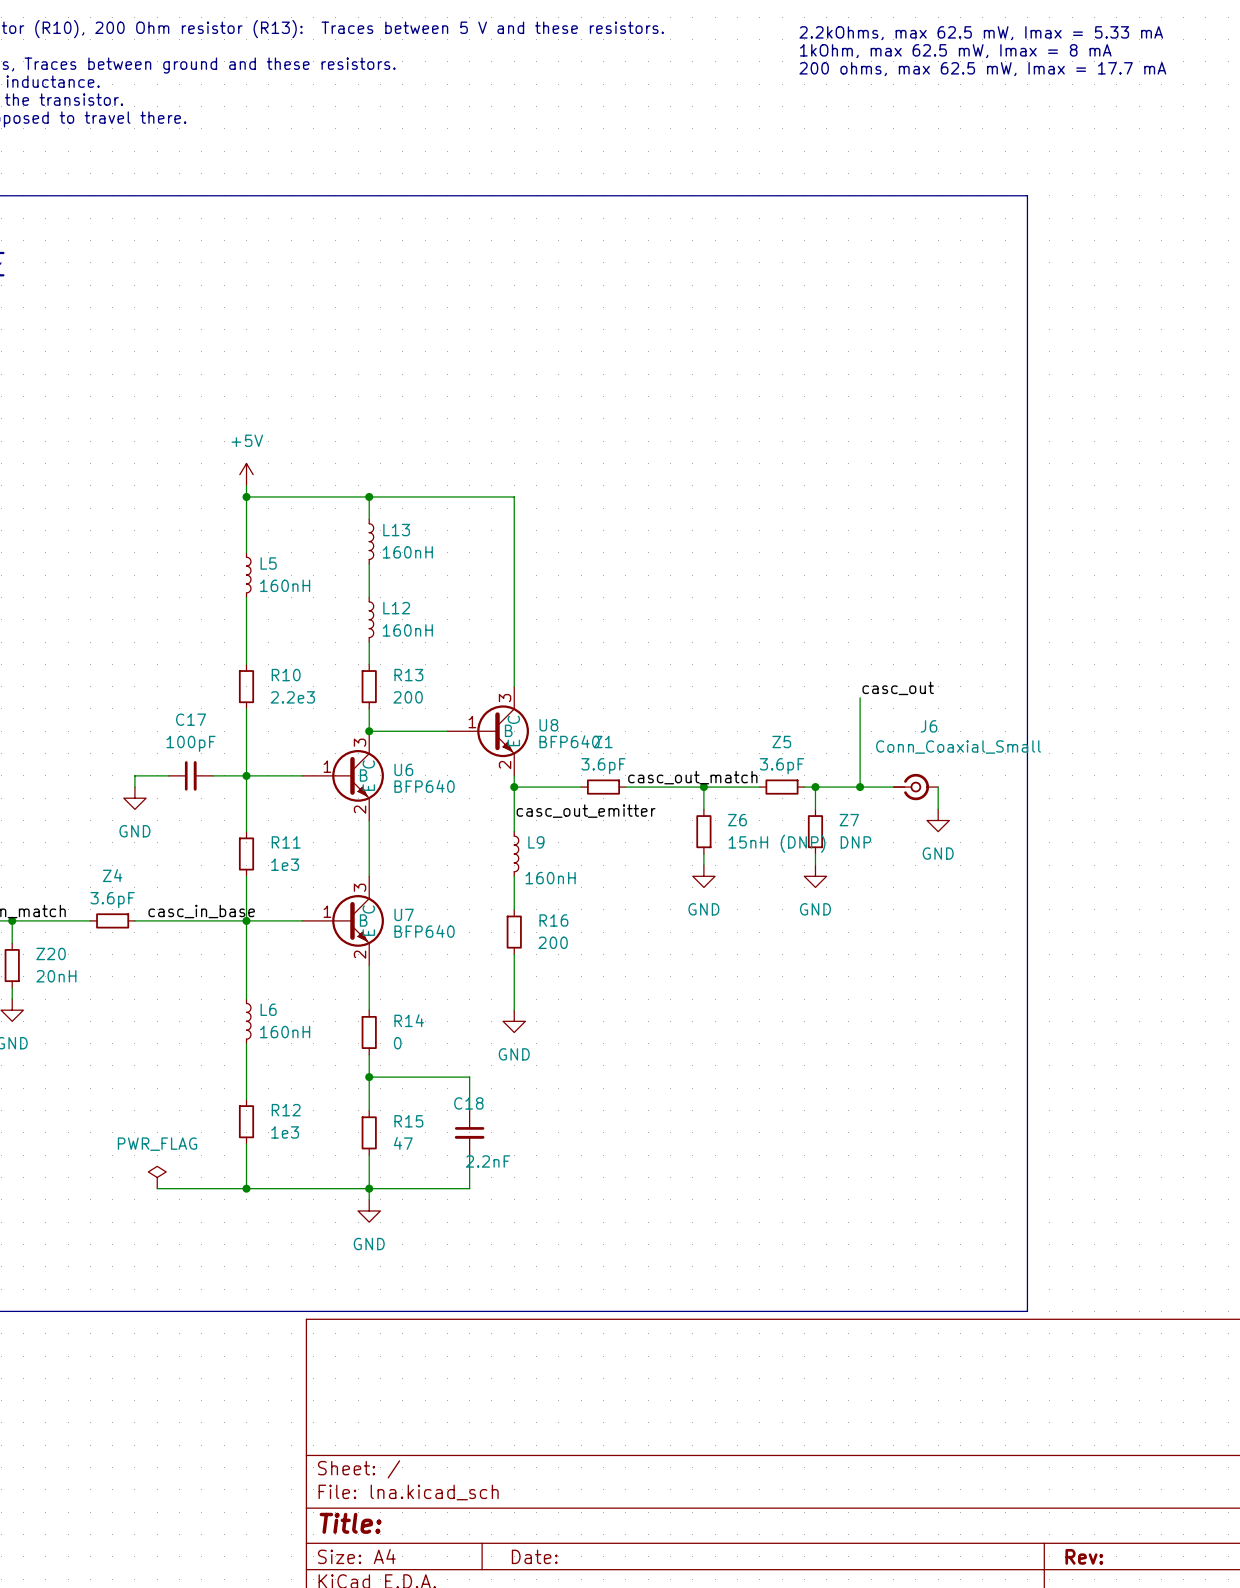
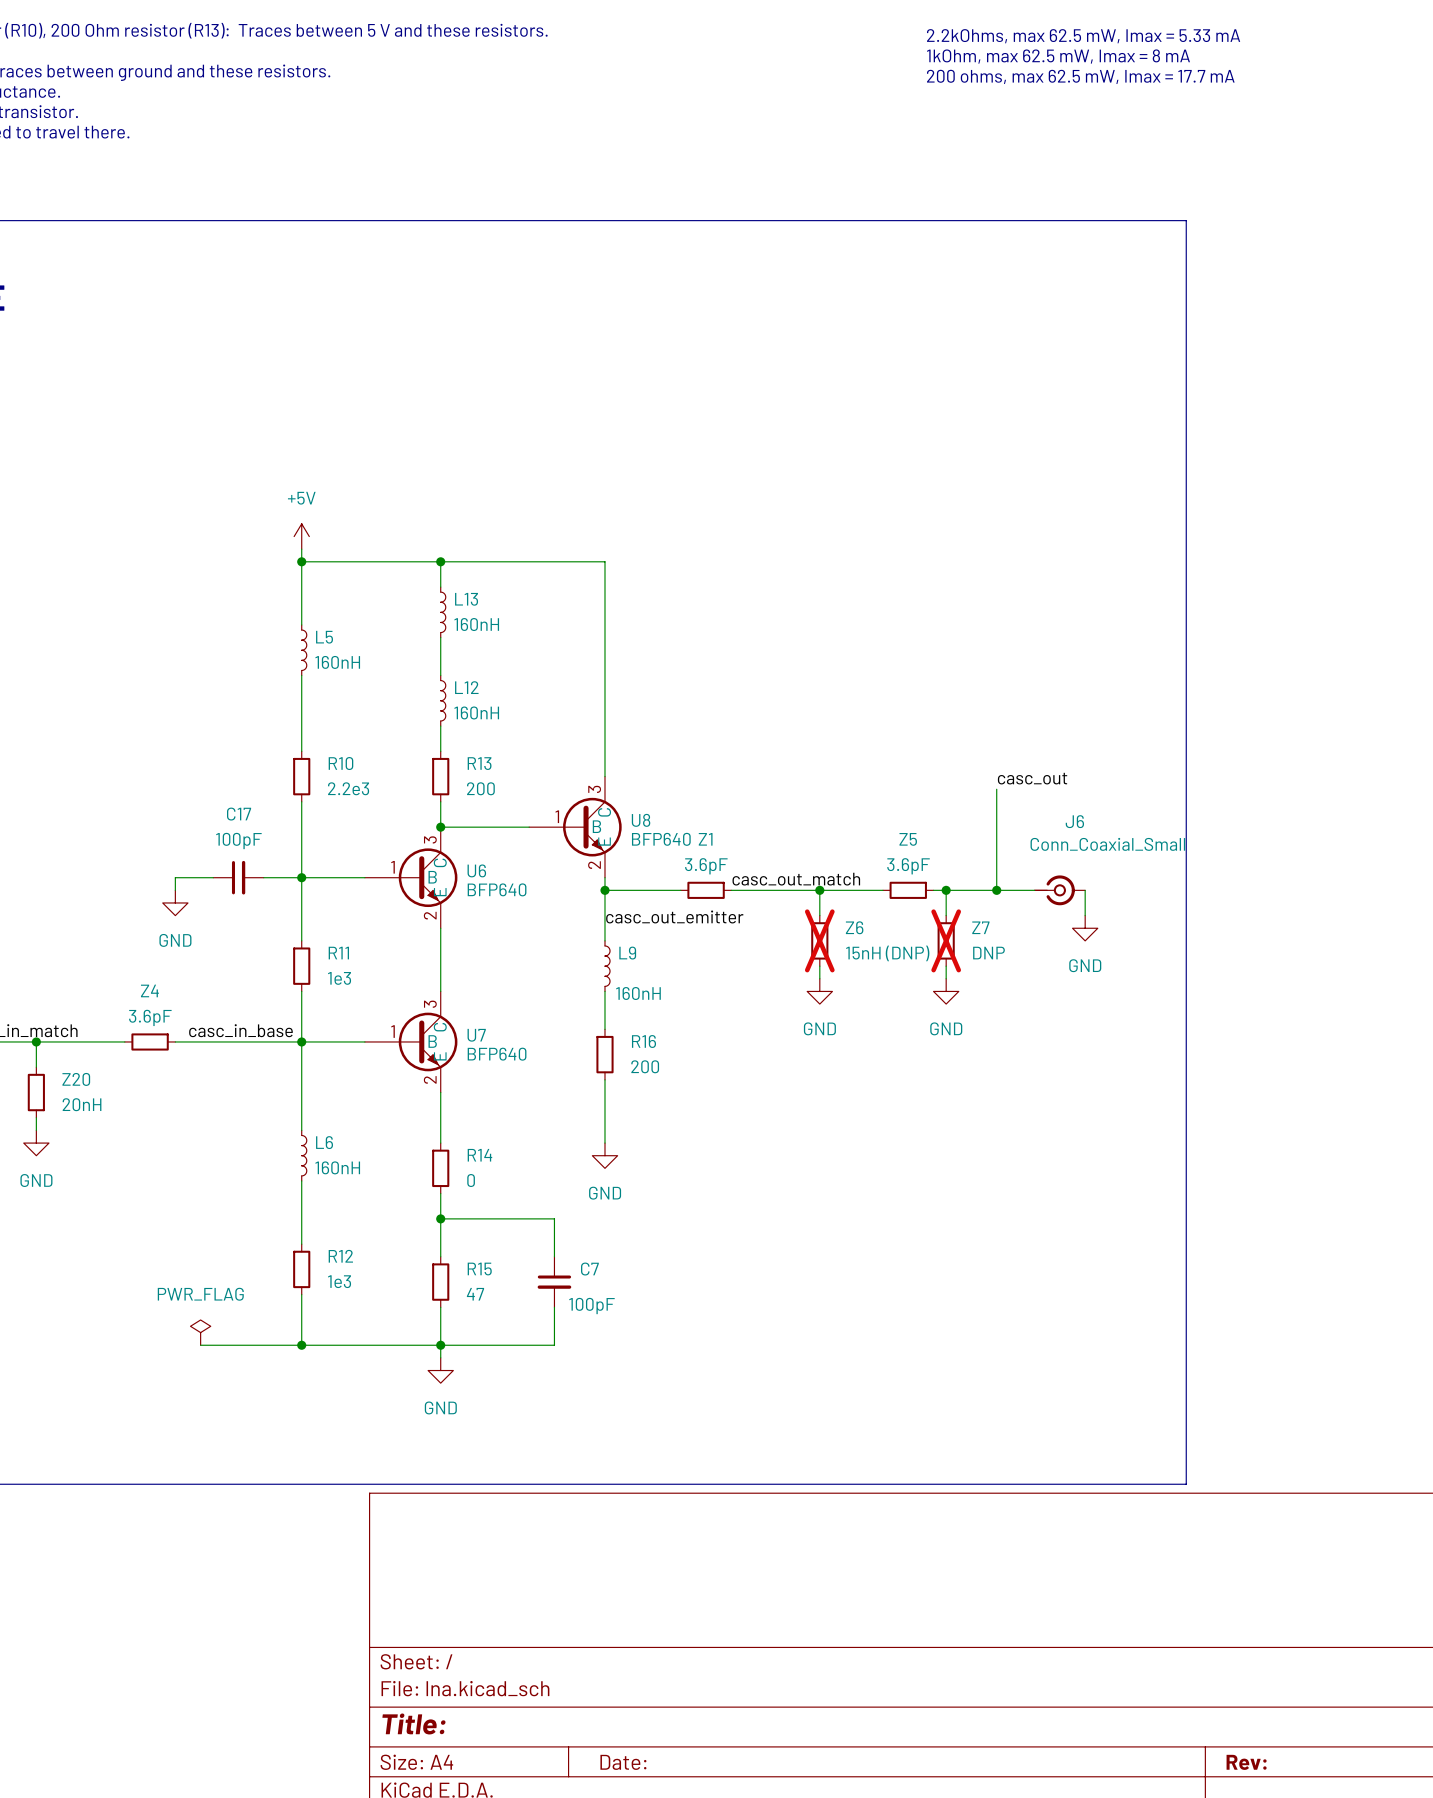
Z6 do-not-place cross: none -> (819, 940)
Z7 do-not-place cross: none -> (946, 940)
C18 name: C18 (468, 1103) -> C7 (589, 1269)
C18 value: 2.2nF (488, 1161) -> 100pF (591, 1306)

